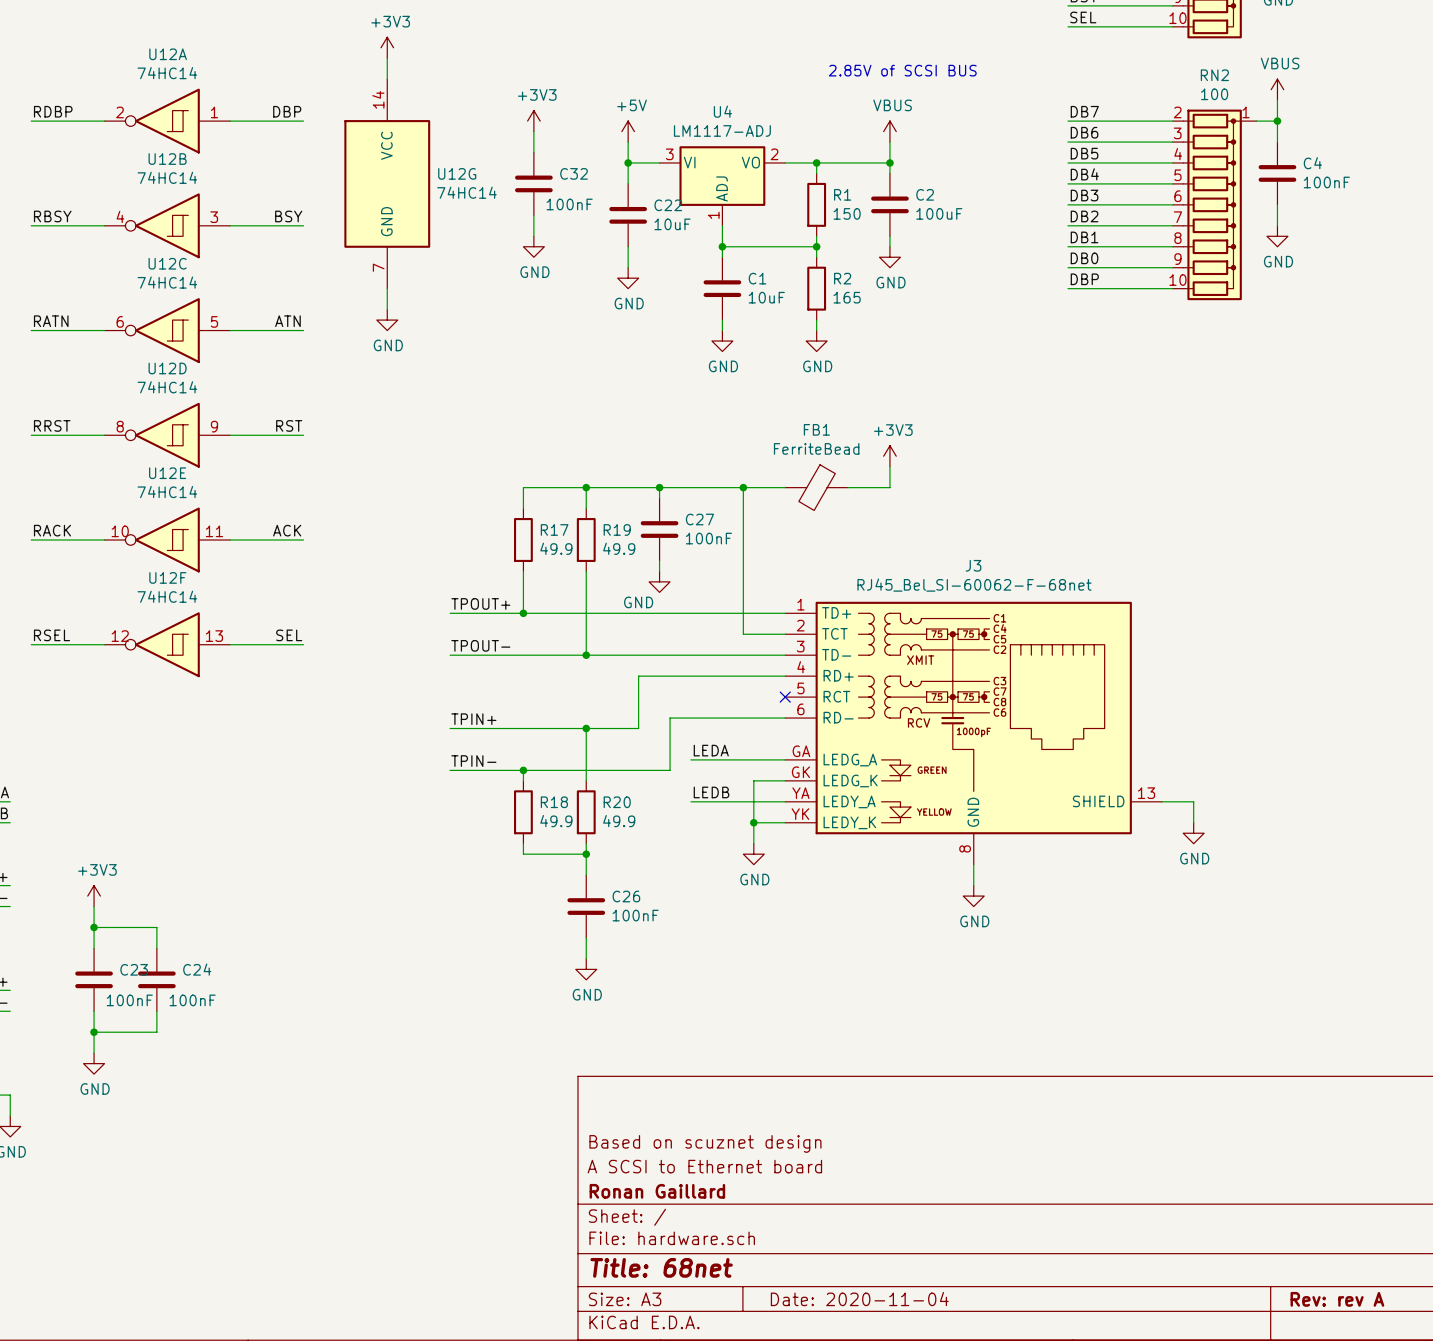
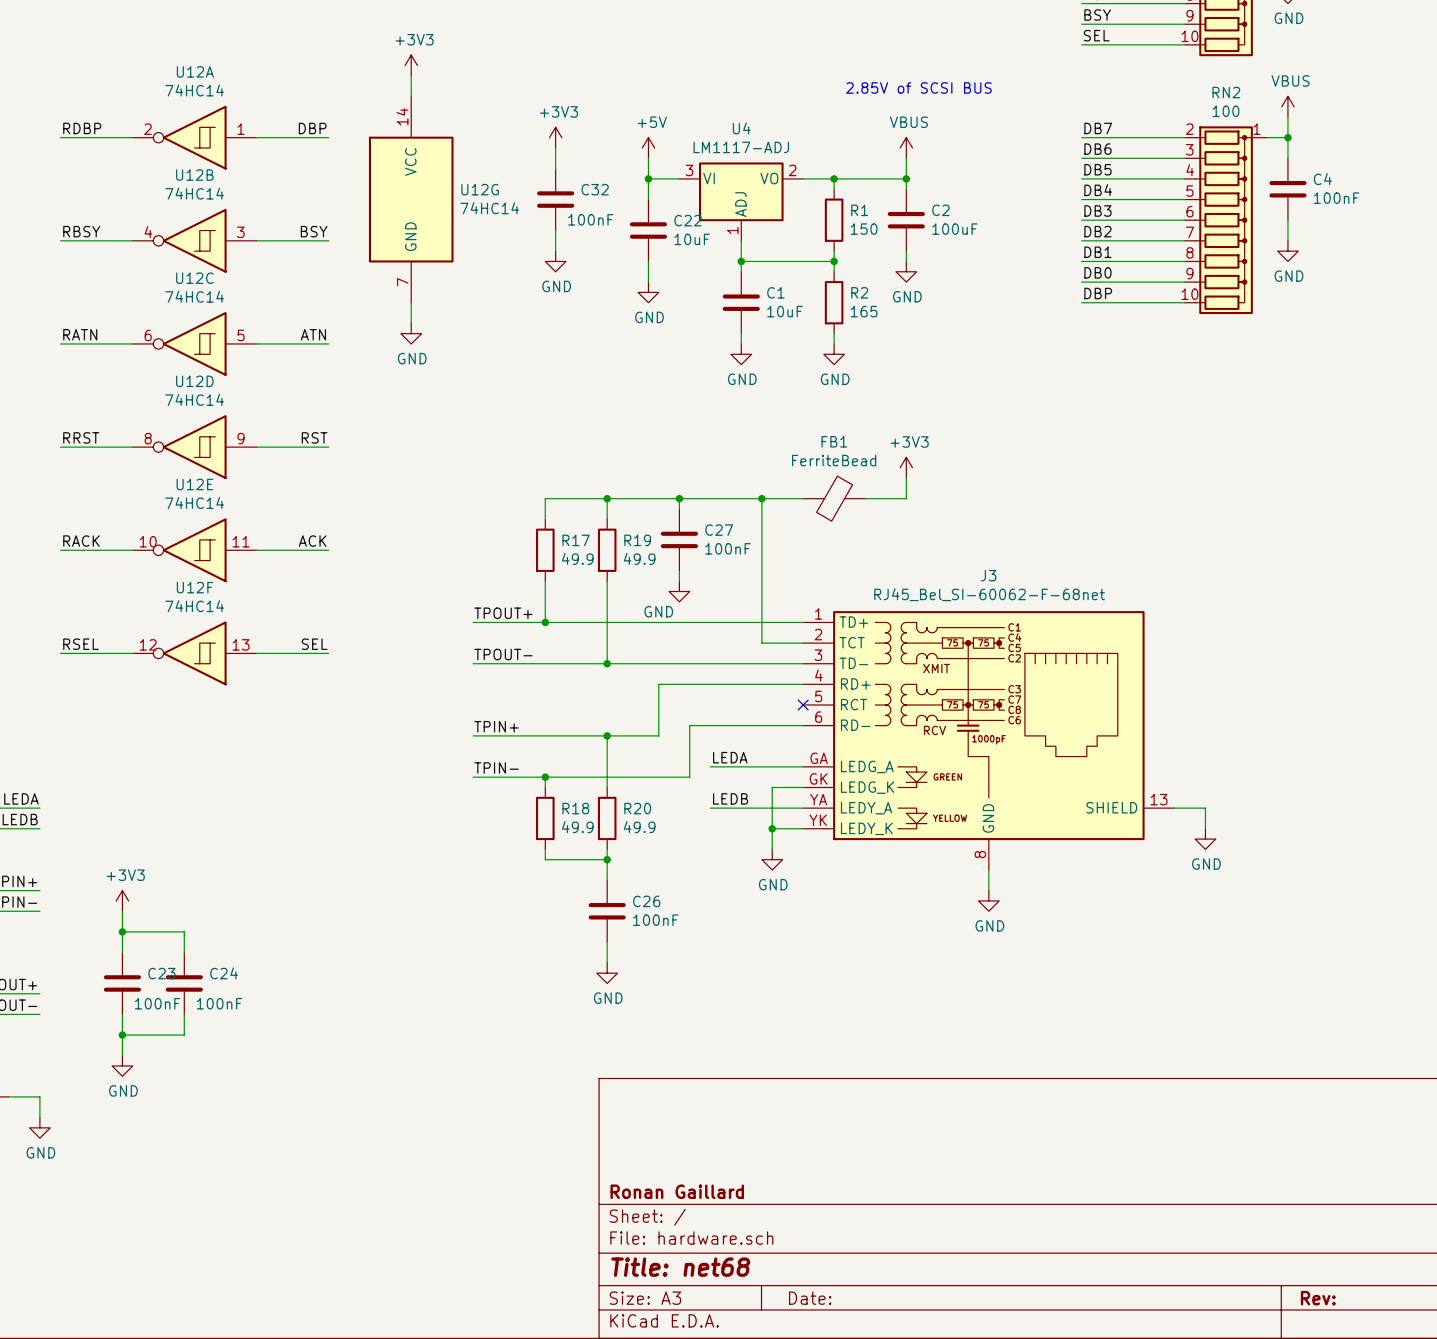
title block: Based on scuznet design (705, 1143) -> none
title block: A SCSI to Ethernet board (704, 1166) -> none
title block: Title: 68net (661, 1267) -> Title: net68 (680, 1267)
title block: Date: 2020-11-04 (859, 1299) -> Date: (810, 1298)
title block: Rev: rev A (1337, 1299) -> Rev: (1318, 1298)

